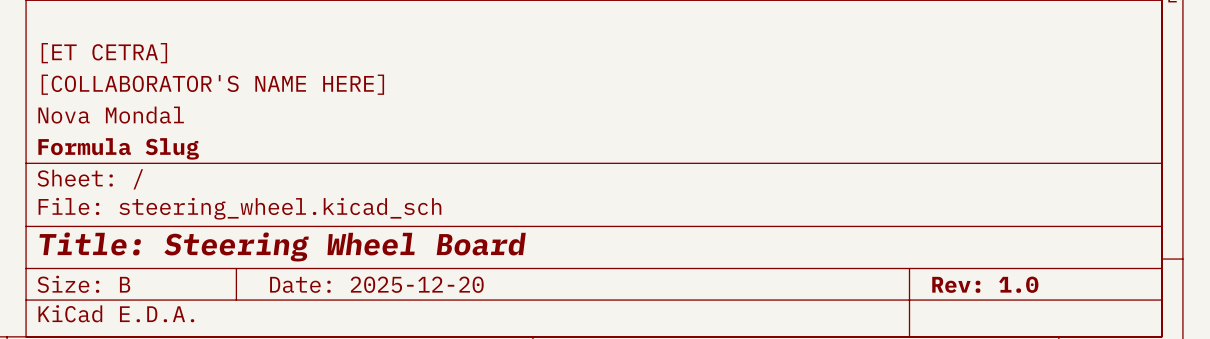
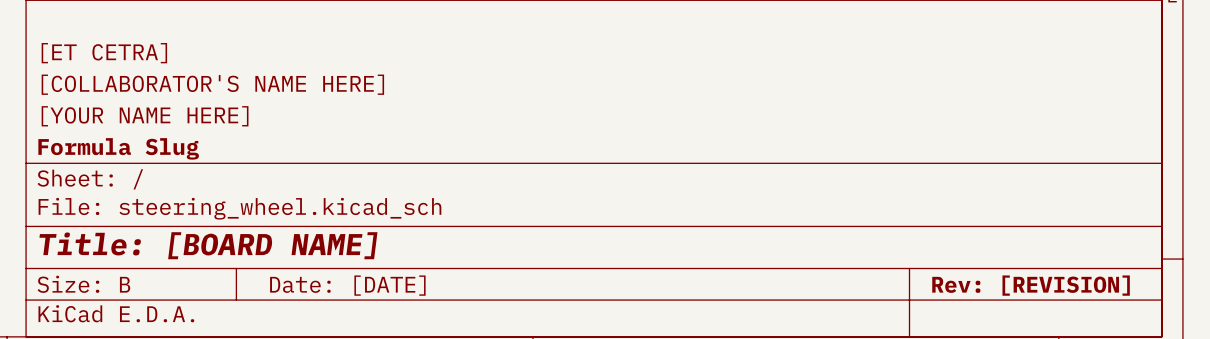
title block: Nova Mondal (111, 115) -> [YOUR NAME HERE] (145, 116)
title block: Title: Steering Wheel Board (282, 246) -> Title: [BOARD NAME] (208, 245)
title block: Date: 2025-12-20 (376, 284) -> Date: [DATE] (347, 285)
title block: Rev: 1.0 (985, 284) -> Rev: [REVISION] (1031, 285)

